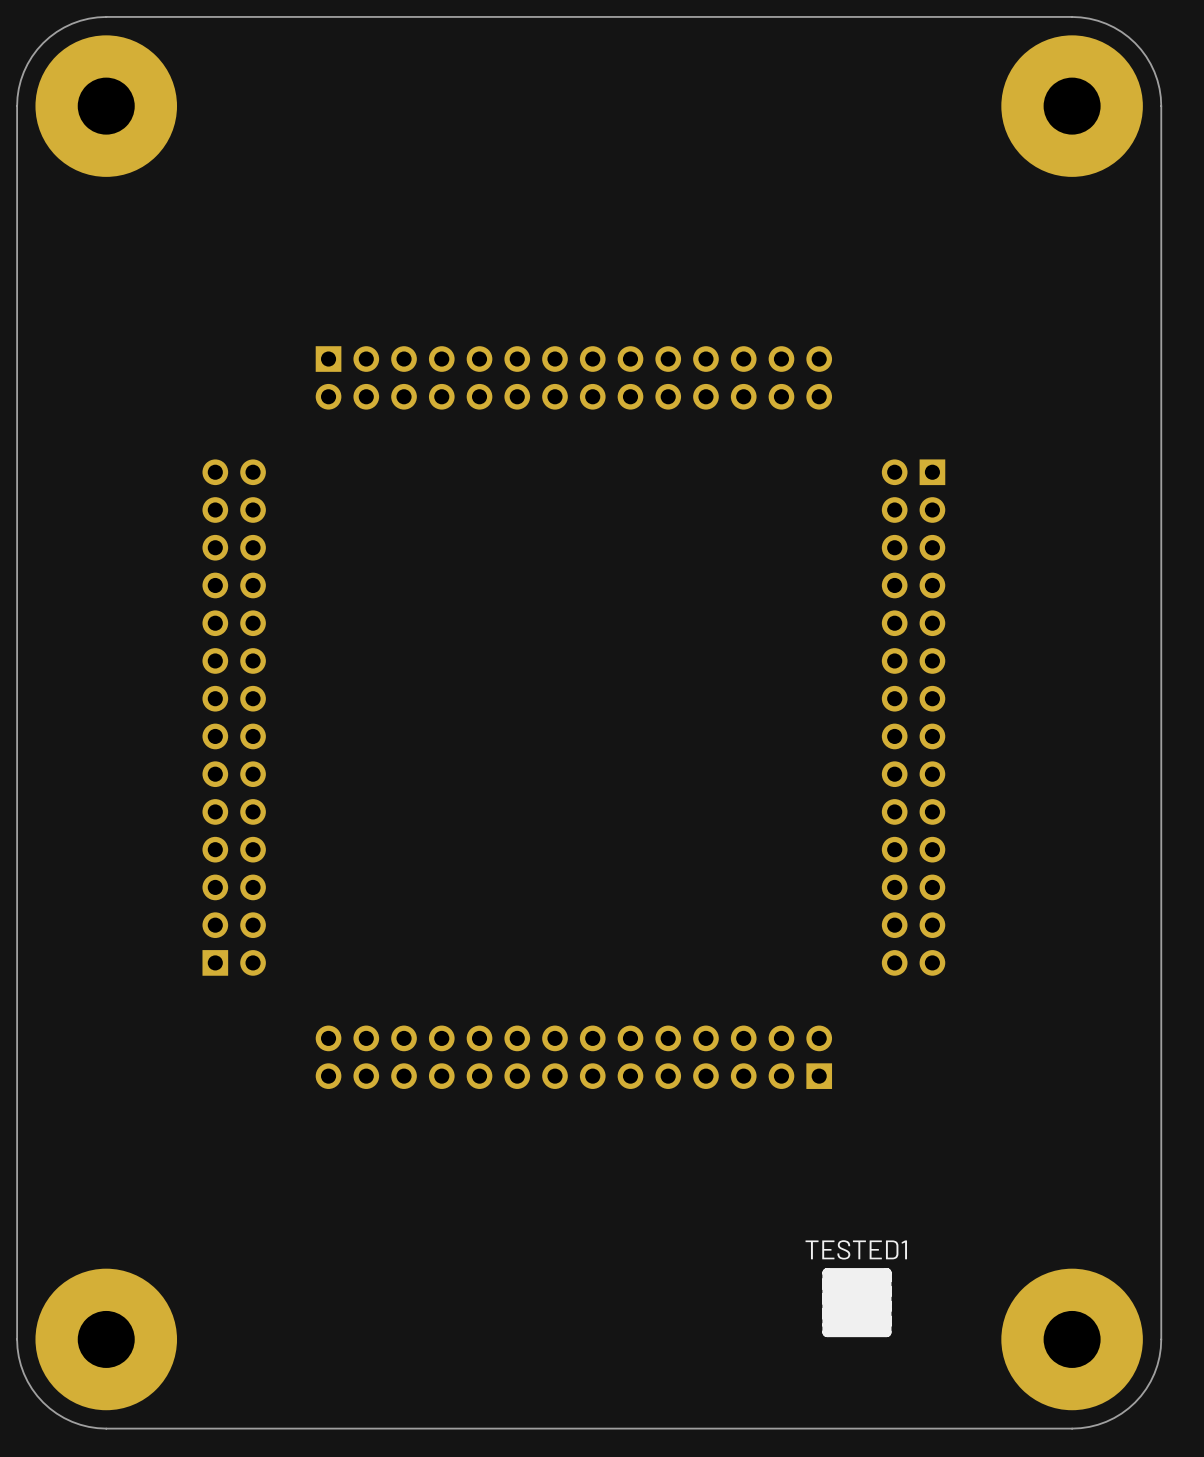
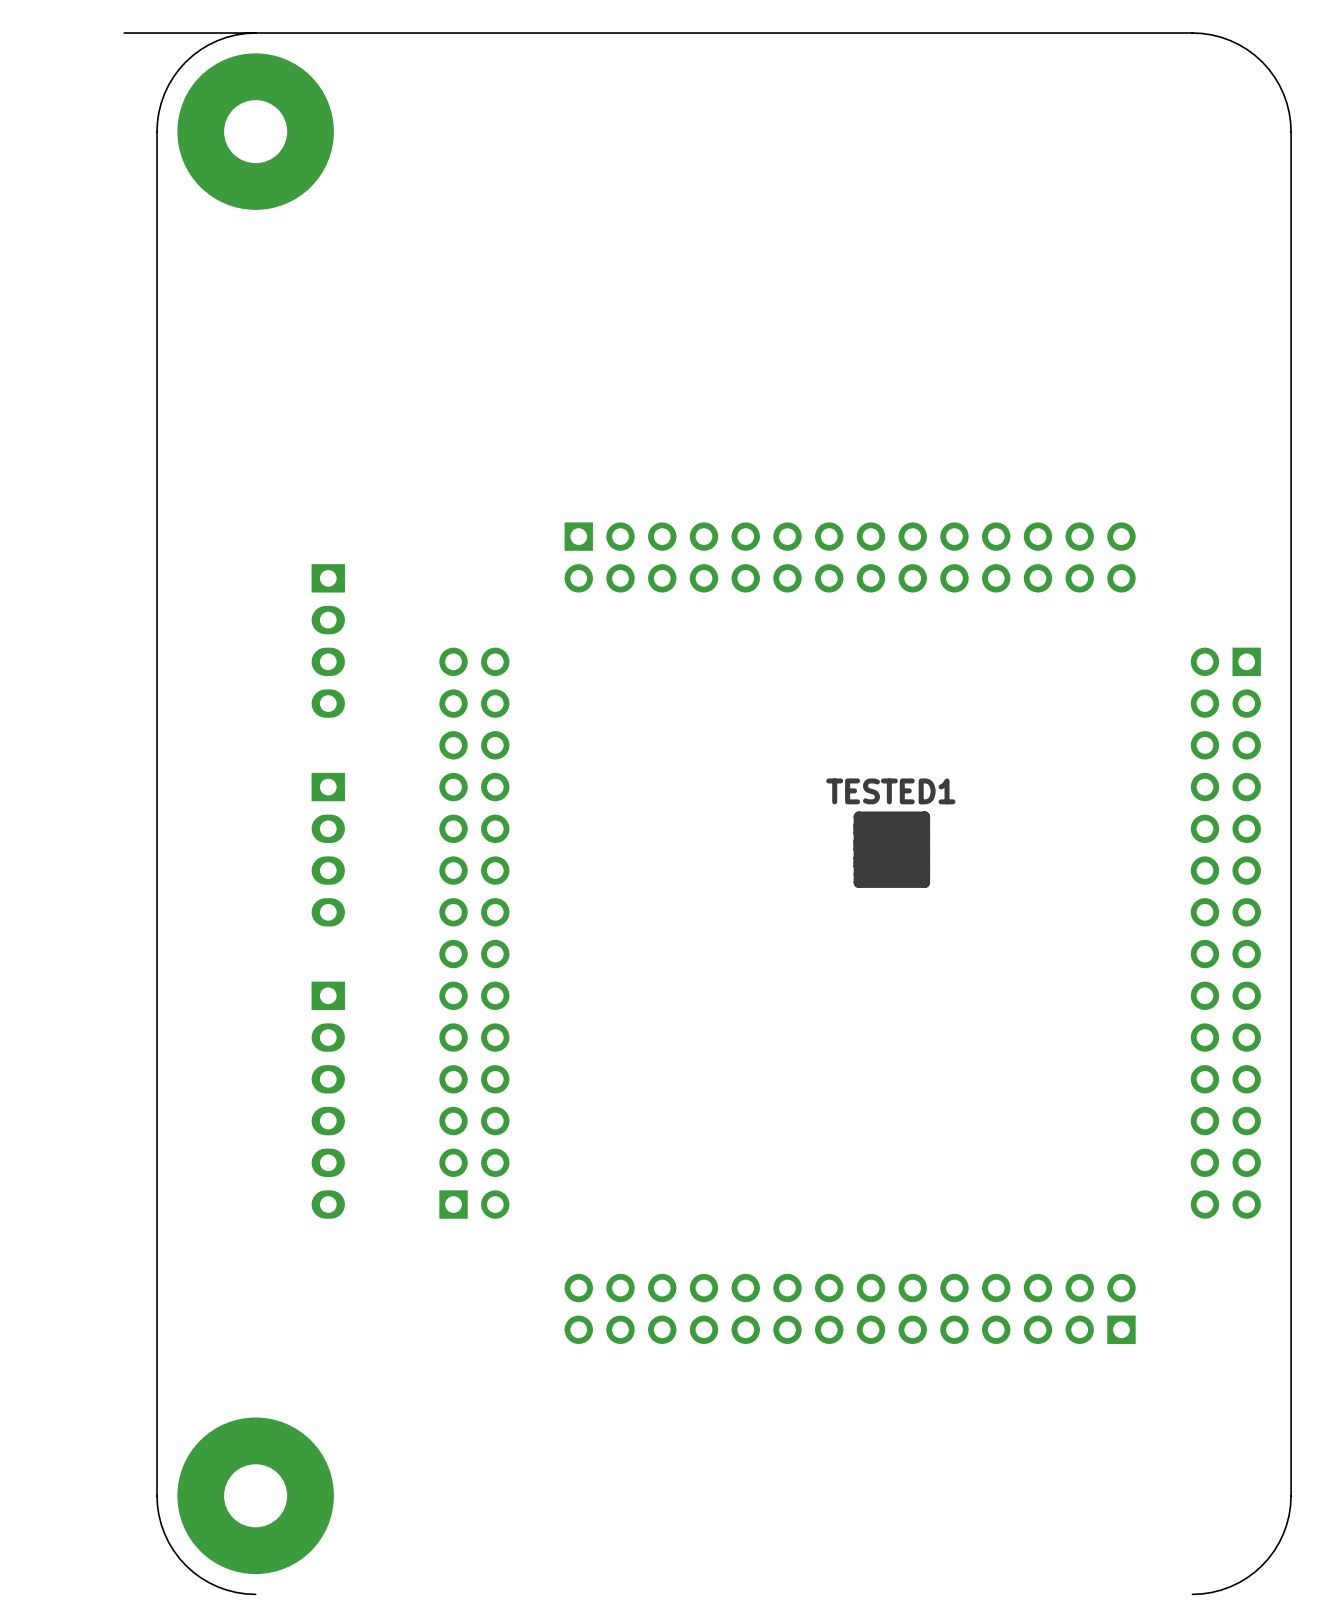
board edge: (106, 16) (88, 18) (72, 23) (56, 31) (43, 43) (32, 56) (23, 72) (17, 97) (17, 1339) (20, 1365) (32, 1388) (43, 1402) (64, 1418) (80, 1424) (106, 1428) (1072, 1428) -> none
board edge: none -> (255, 33) (236, 34) (217, 40) (200, 49) (185, 61) (173, 76) (164, 93) (158, 112) (157, 131) (157, 1505) (164, 1533) (173, 1550) (185, 1565) (200, 1577) (217, 1586) (236, 1592) (255, 1594)
part position: (106, 106) -> (255, 131)
part: (1072, 106) -> none
part: (573, 377) -> none
part: none -> (850, 557)
part: none -> (328, 640)
part: (234, 717) -> none
part: (913, 717) -> none
part: none -> (328, 849)
part: none -> (474, 933)
part: none -> (1225, 933)
part: none -> (328, 1100)
part: (573, 1057) -> none
part: none -> (850, 1308)
TESTED1 position: (856, 1302) -> (891, 849)
part position: (106, 1339) -> (255, 1495)
part: (1072, 1339) -> none

